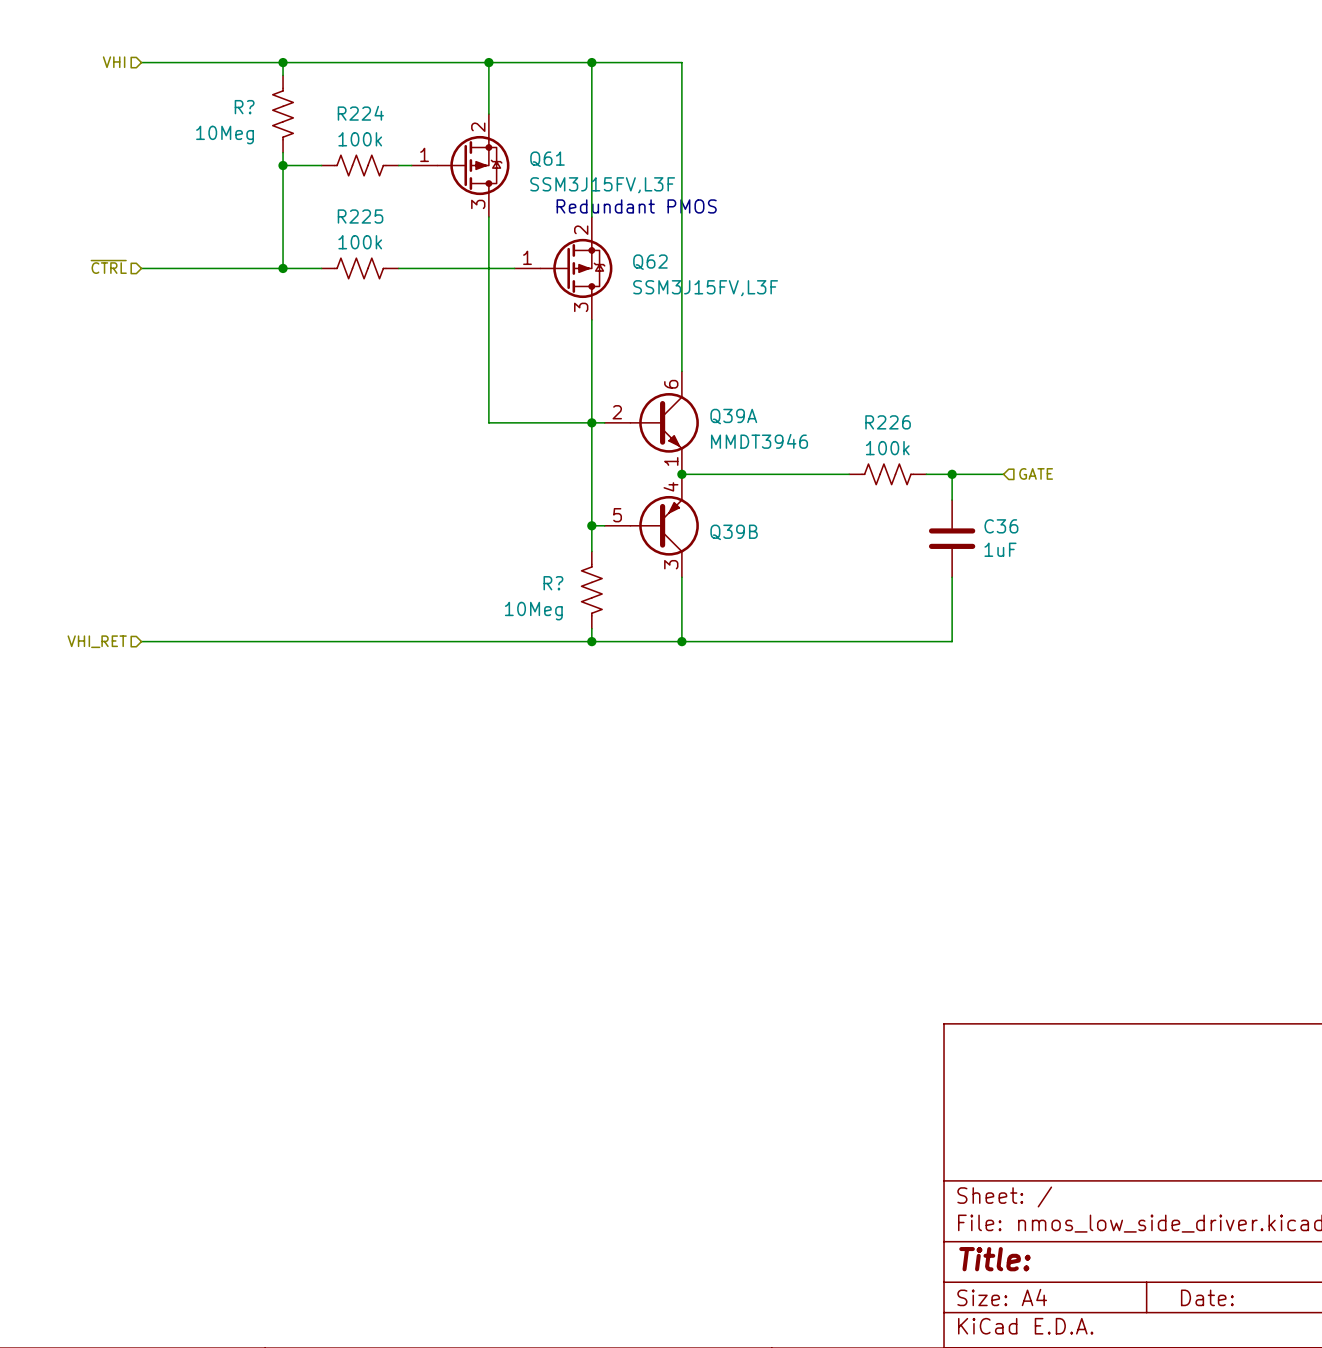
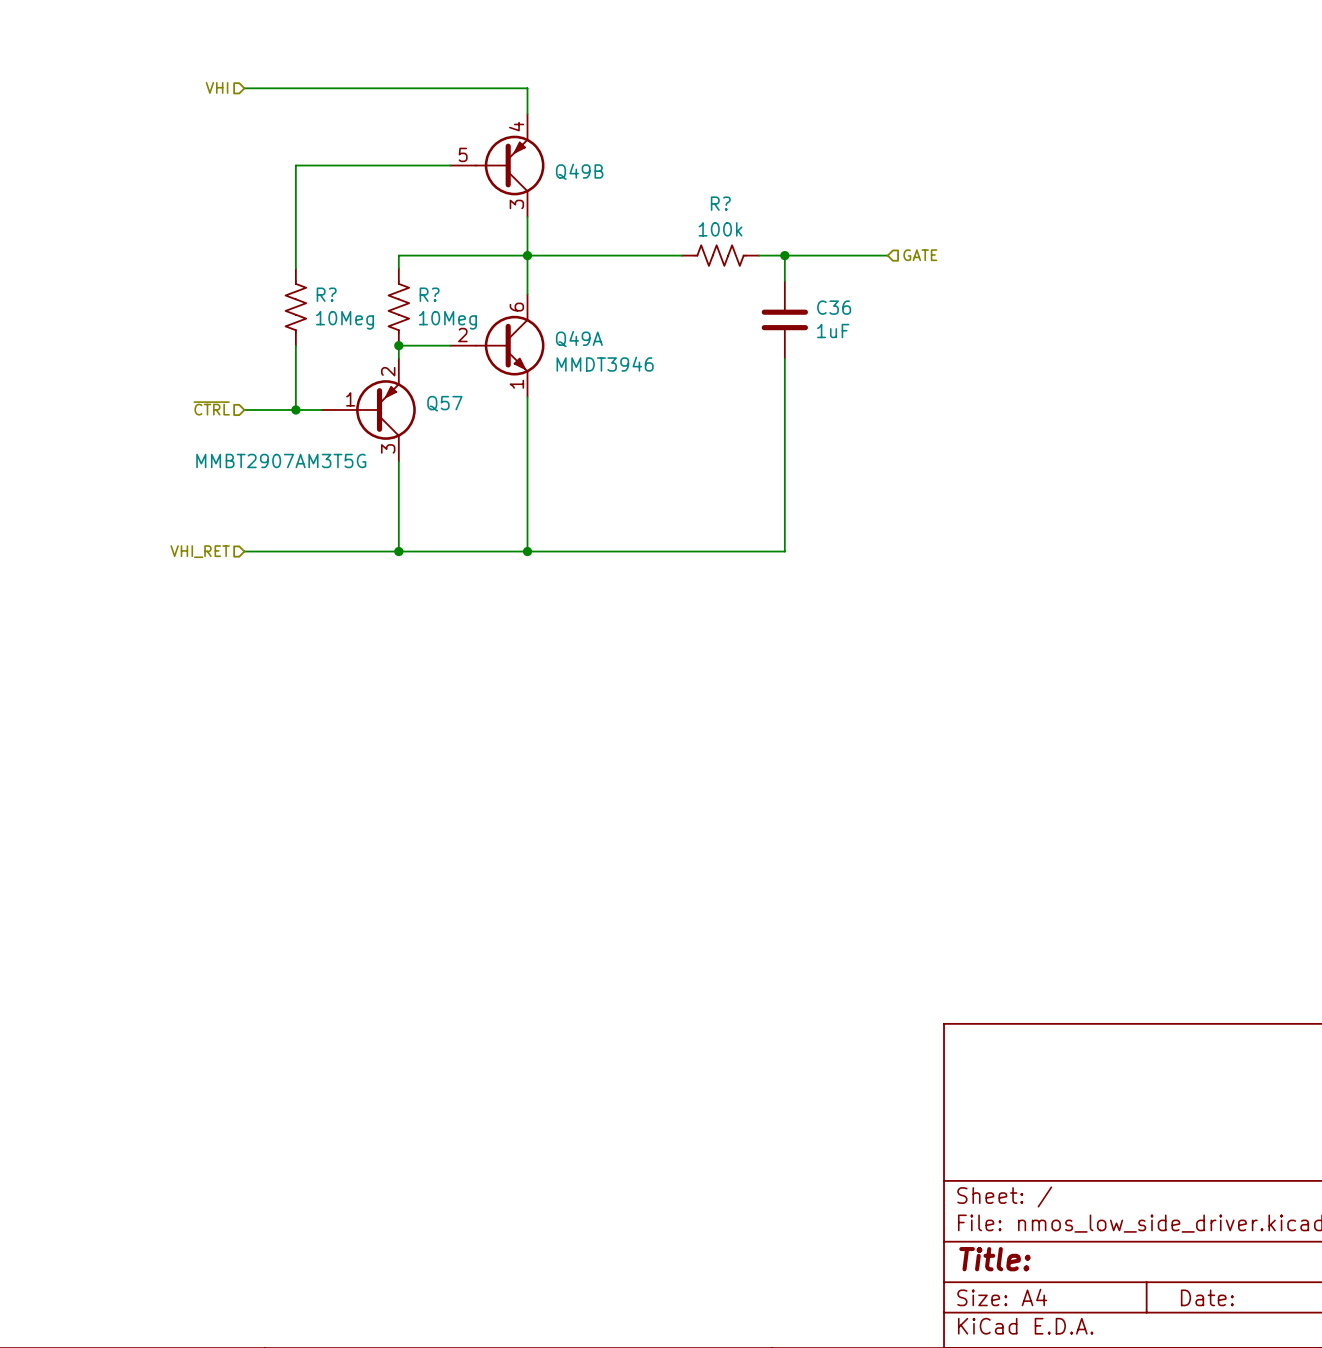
hierarchical label position: VHI (114, 62) -> VHI (217, 87)
wire: (141, 62) (681, 62) (681, 371) -> none
wire: (283, 62) (283, 75) -> none
junction: (283, 62) -> none
wire: (488, 62) (488, 114) -> none
junction: (488, 62) -> none
wire: (591, 62) (591, 216) -> none
junction: (591, 62) -> none
wire: none -> (244, 88) (527, 88) (527, 114)
R?: 10Meg (283, 114) -> none
wire: (283, 152) (283, 268) -> none
wire: (283, 165) (295, 165) -> (295, 268) (295, 165)
junction: (283, 165) -> none
R224: 100k (360, 165) -> none
Q61: SSM3J15FV,L3F (460, 165) -> none
Q49B: none -> (497, 165)
text: Redundant PMOS (636, 206) -> none
wire: (488, 216) (488, 422) (604, 422) -> none
wire: none -> (527, 216) (527, 294)
junction: none -> (527, 255)
R?: none -> 100k (720, 255)
wire: none -> (759, 255) (887, 255)
wire: none -> (784, 255) (784, 281)
junction: none -> (784, 255)
hierarchical label position: ~{CTRL} (108, 266) -> ~{CTRL} (211, 408)
wire: (141, 268) (321, 268) -> none
junction: (283, 268) -> none
R225: 100k (360, 268) -> none
wire: (398, 268) (514, 268) -> (398, 268) (398, 255) (681, 255)
Q62: SSM3J15FV,L3F (563, 268) -> none
R?: none -> 10Meg (295, 307)
R?: none -> 10Meg (398, 307)
wire: (591, 319) (591, 551) -> none
wire: none -> (295, 345) (295, 409)
junction: none -> (398, 345)
wire: none -> (450, 345) (398, 345) (398, 358)
Q49A: none -> MMDT3946 (497, 345)
wire: none -> (784, 358) (784, 551) (244, 551)
wire: none -> (527, 397) (527, 551)
wire: none -> (244, 409) (321, 409)
junction: none -> (295, 409)
Q57: none -> MMBT2907AM3T5G (368, 409)
junction: (591, 422) -> none
Q39A: MMDT3946 (651, 422) -> none
wire: none -> (398, 461) (398, 551)
hierarchical label position: GATE (1036, 473) -> GATE (920, 255)
wire: (681, 474) (849, 474) -> none
junction: (681, 474) -> none
R226: 100k (887, 474) -> none
wire: (926, 474) (1003, 474) -> none
wire: (952, 474) (952, 500) -> none
junction: (952, 474) -> none
wire: (591, 525) (604, 525) -> none
junction: (591, 525) -> none
Q39B: (651, 525) -> none
C36 position: (952, 538) -> (784, 319)
junction: none -> (398, 551)
junction: none -> (527, 551)
wire: (681, 577) (681, 641) -> none
wire: (952, 577) (952, 641) (141, 641) -> none
R?: 10Meg (591, 590) -> none
wire: (591, 628) (591, 641) -> none
hierarchical label position: VHI_RET (97, 641) -> VHI_RET (200, 551)
junction: (591, 641) -> none
junction: (681, 641) -> none

